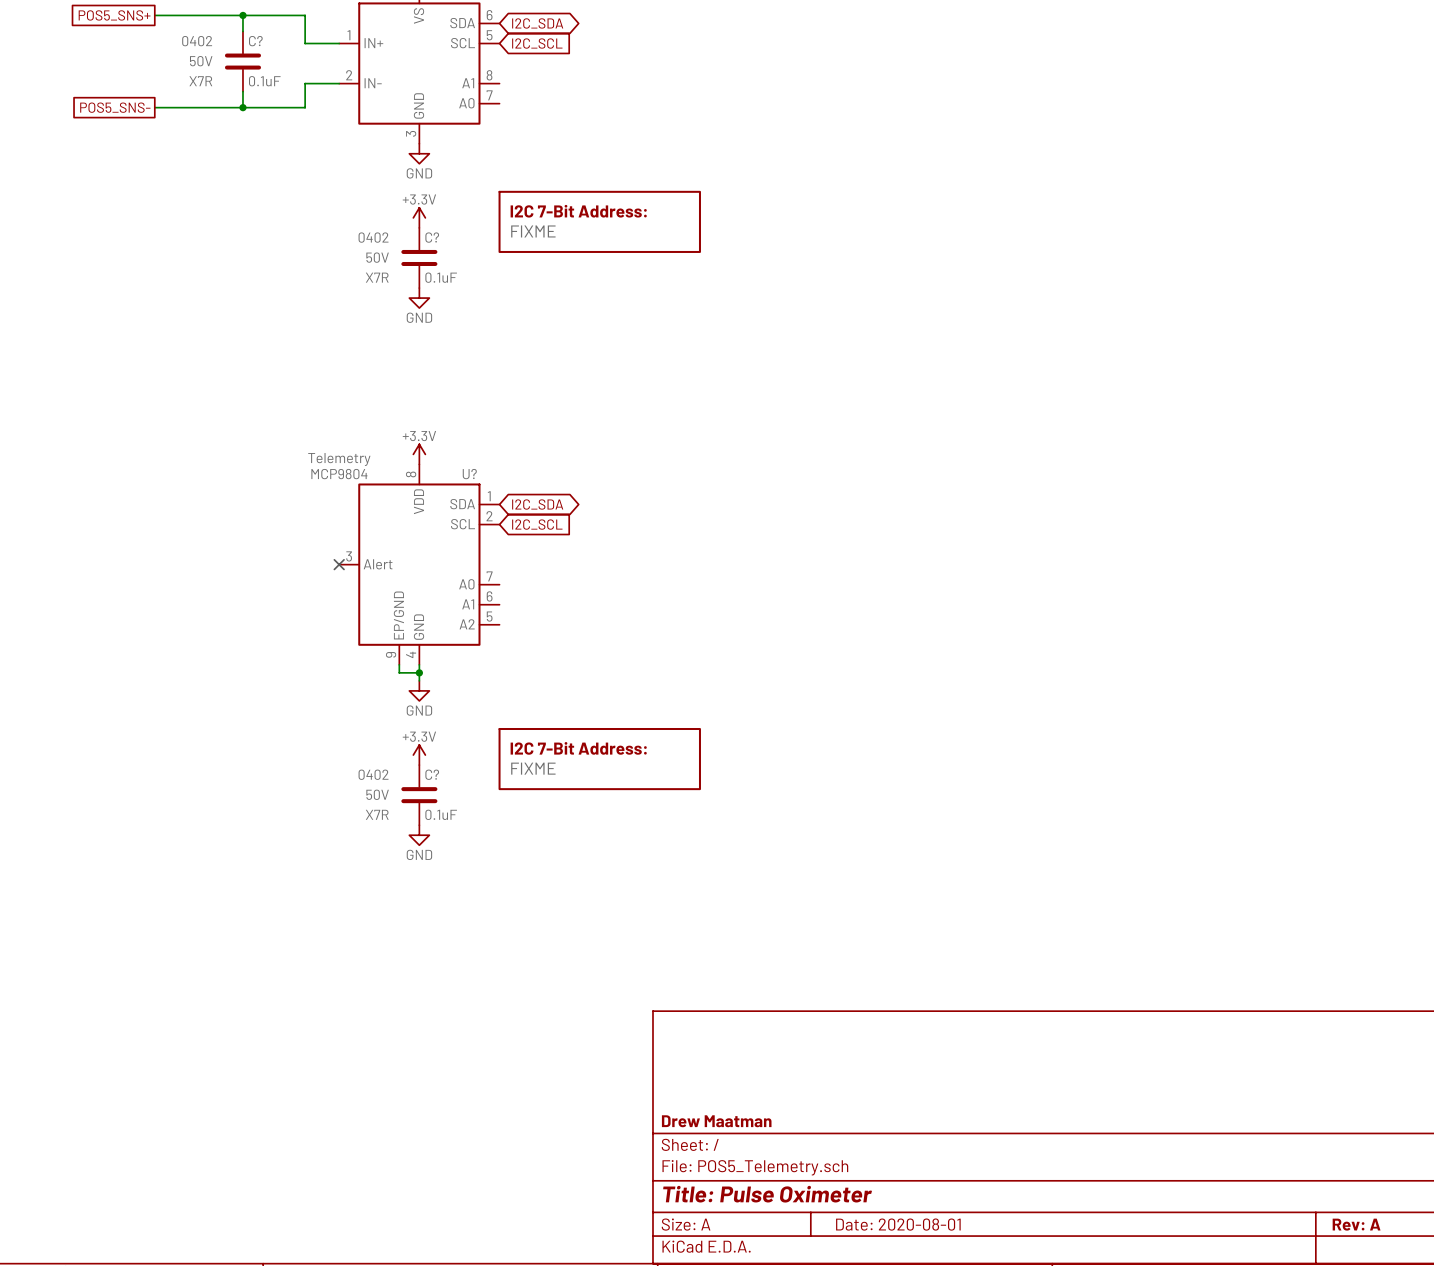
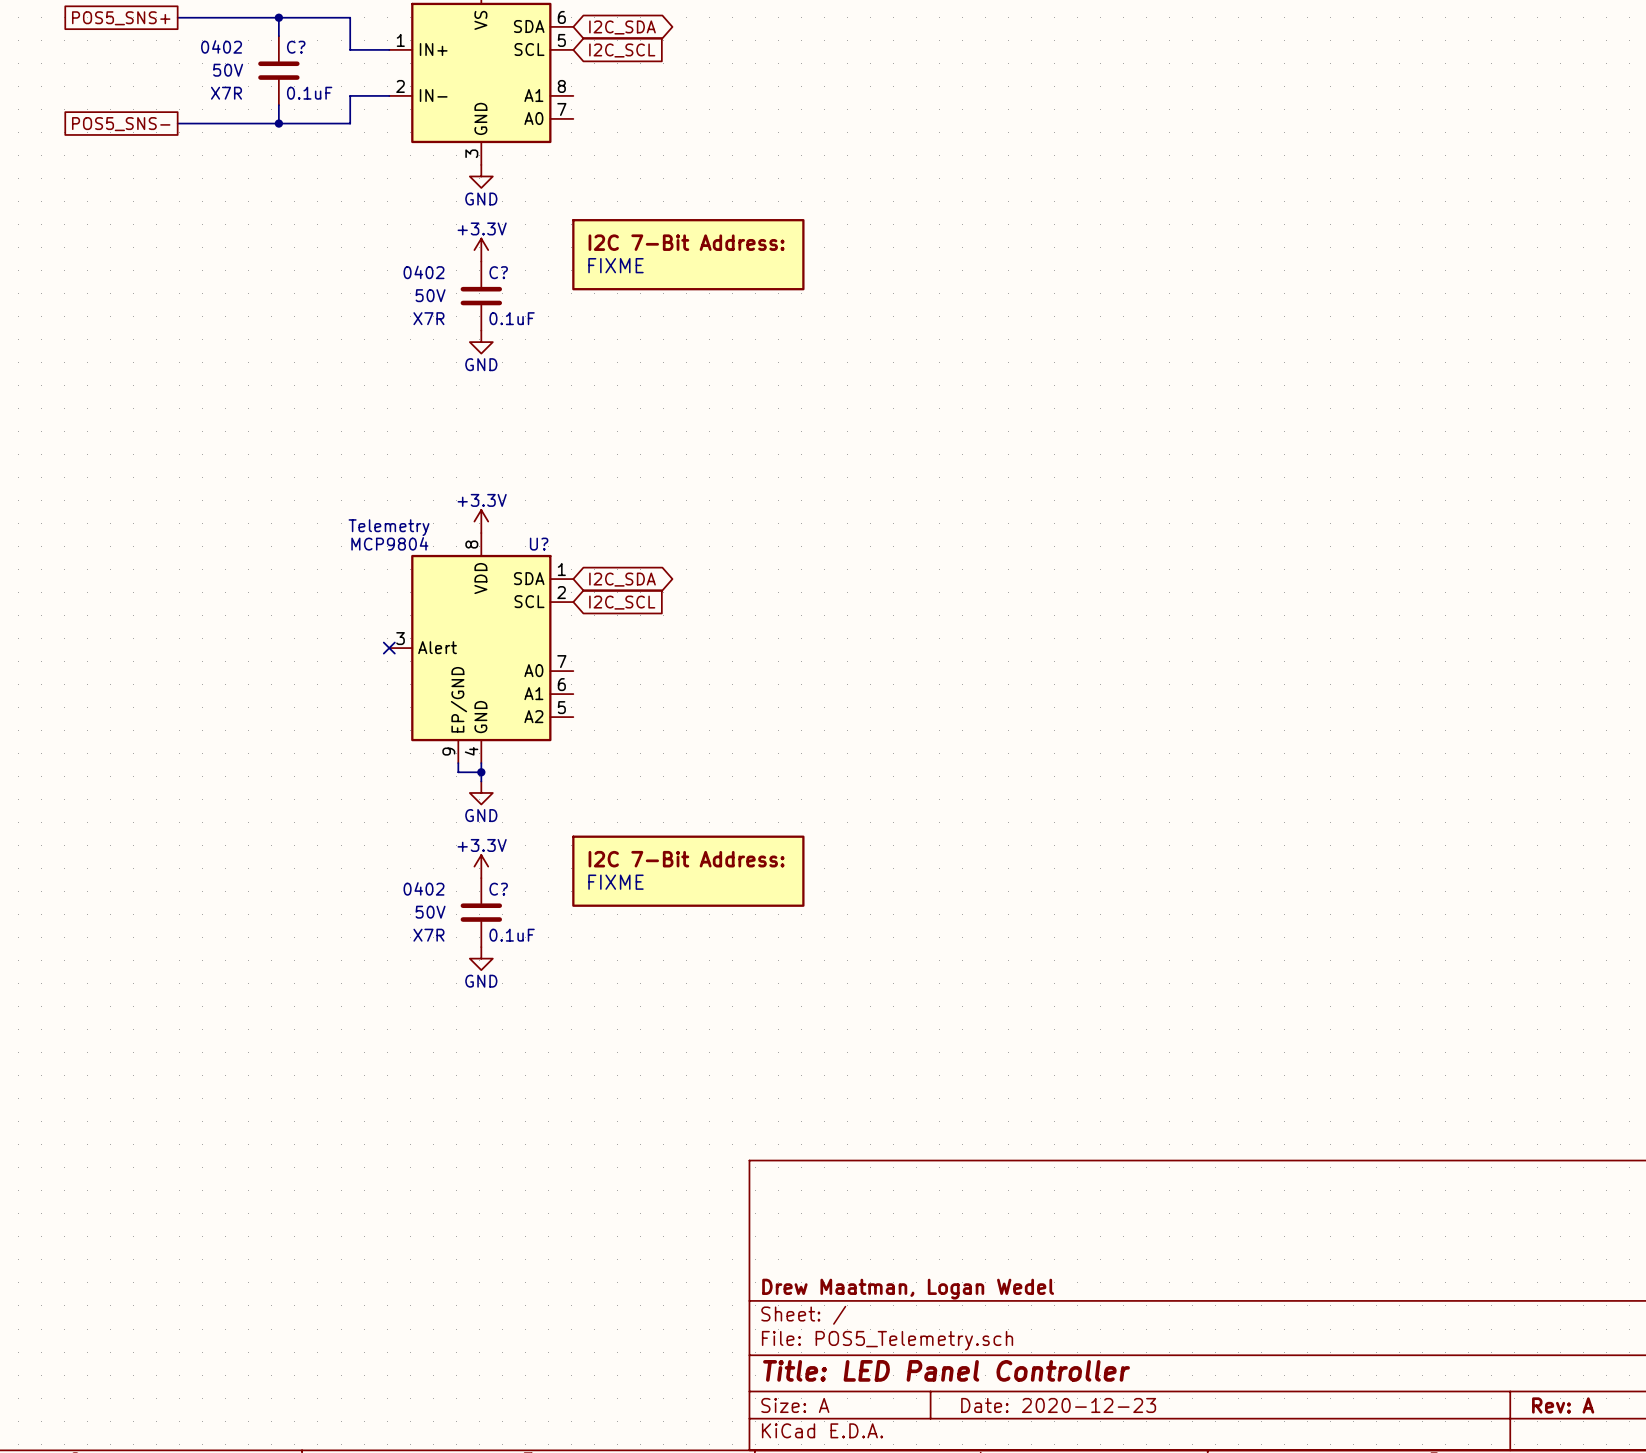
title block: Drew Maatman (716, 1121) -> Drew Maatman, Logan Wedel (908, 1289)
title block: Title: Pulse Oximeter (767, 1194) -> Title: LED Panel Controller (946, 1370)
title block: Date: 2020-08-01 (898, 1224) -> Date: 2020-12-23 (1058, 1405)

